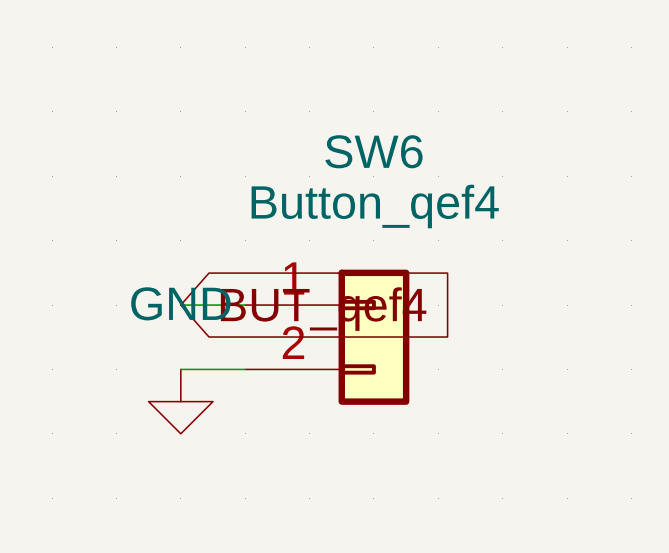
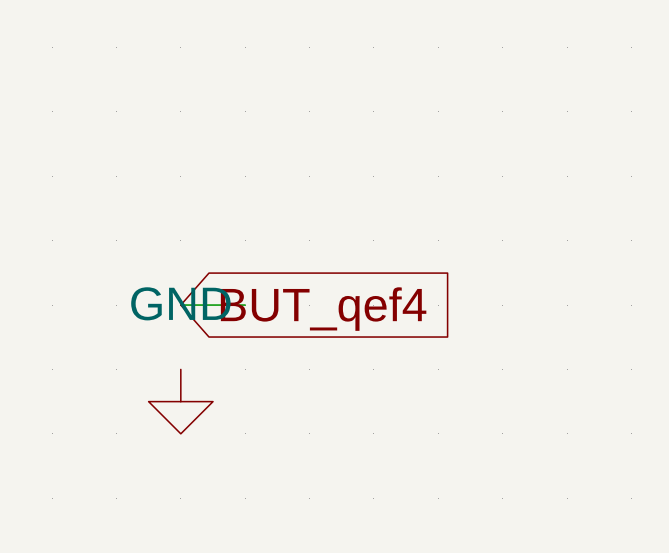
SW6: Button_qef4 (327, 337) -> none
wire: (180, 369) (245, 369) -> none

